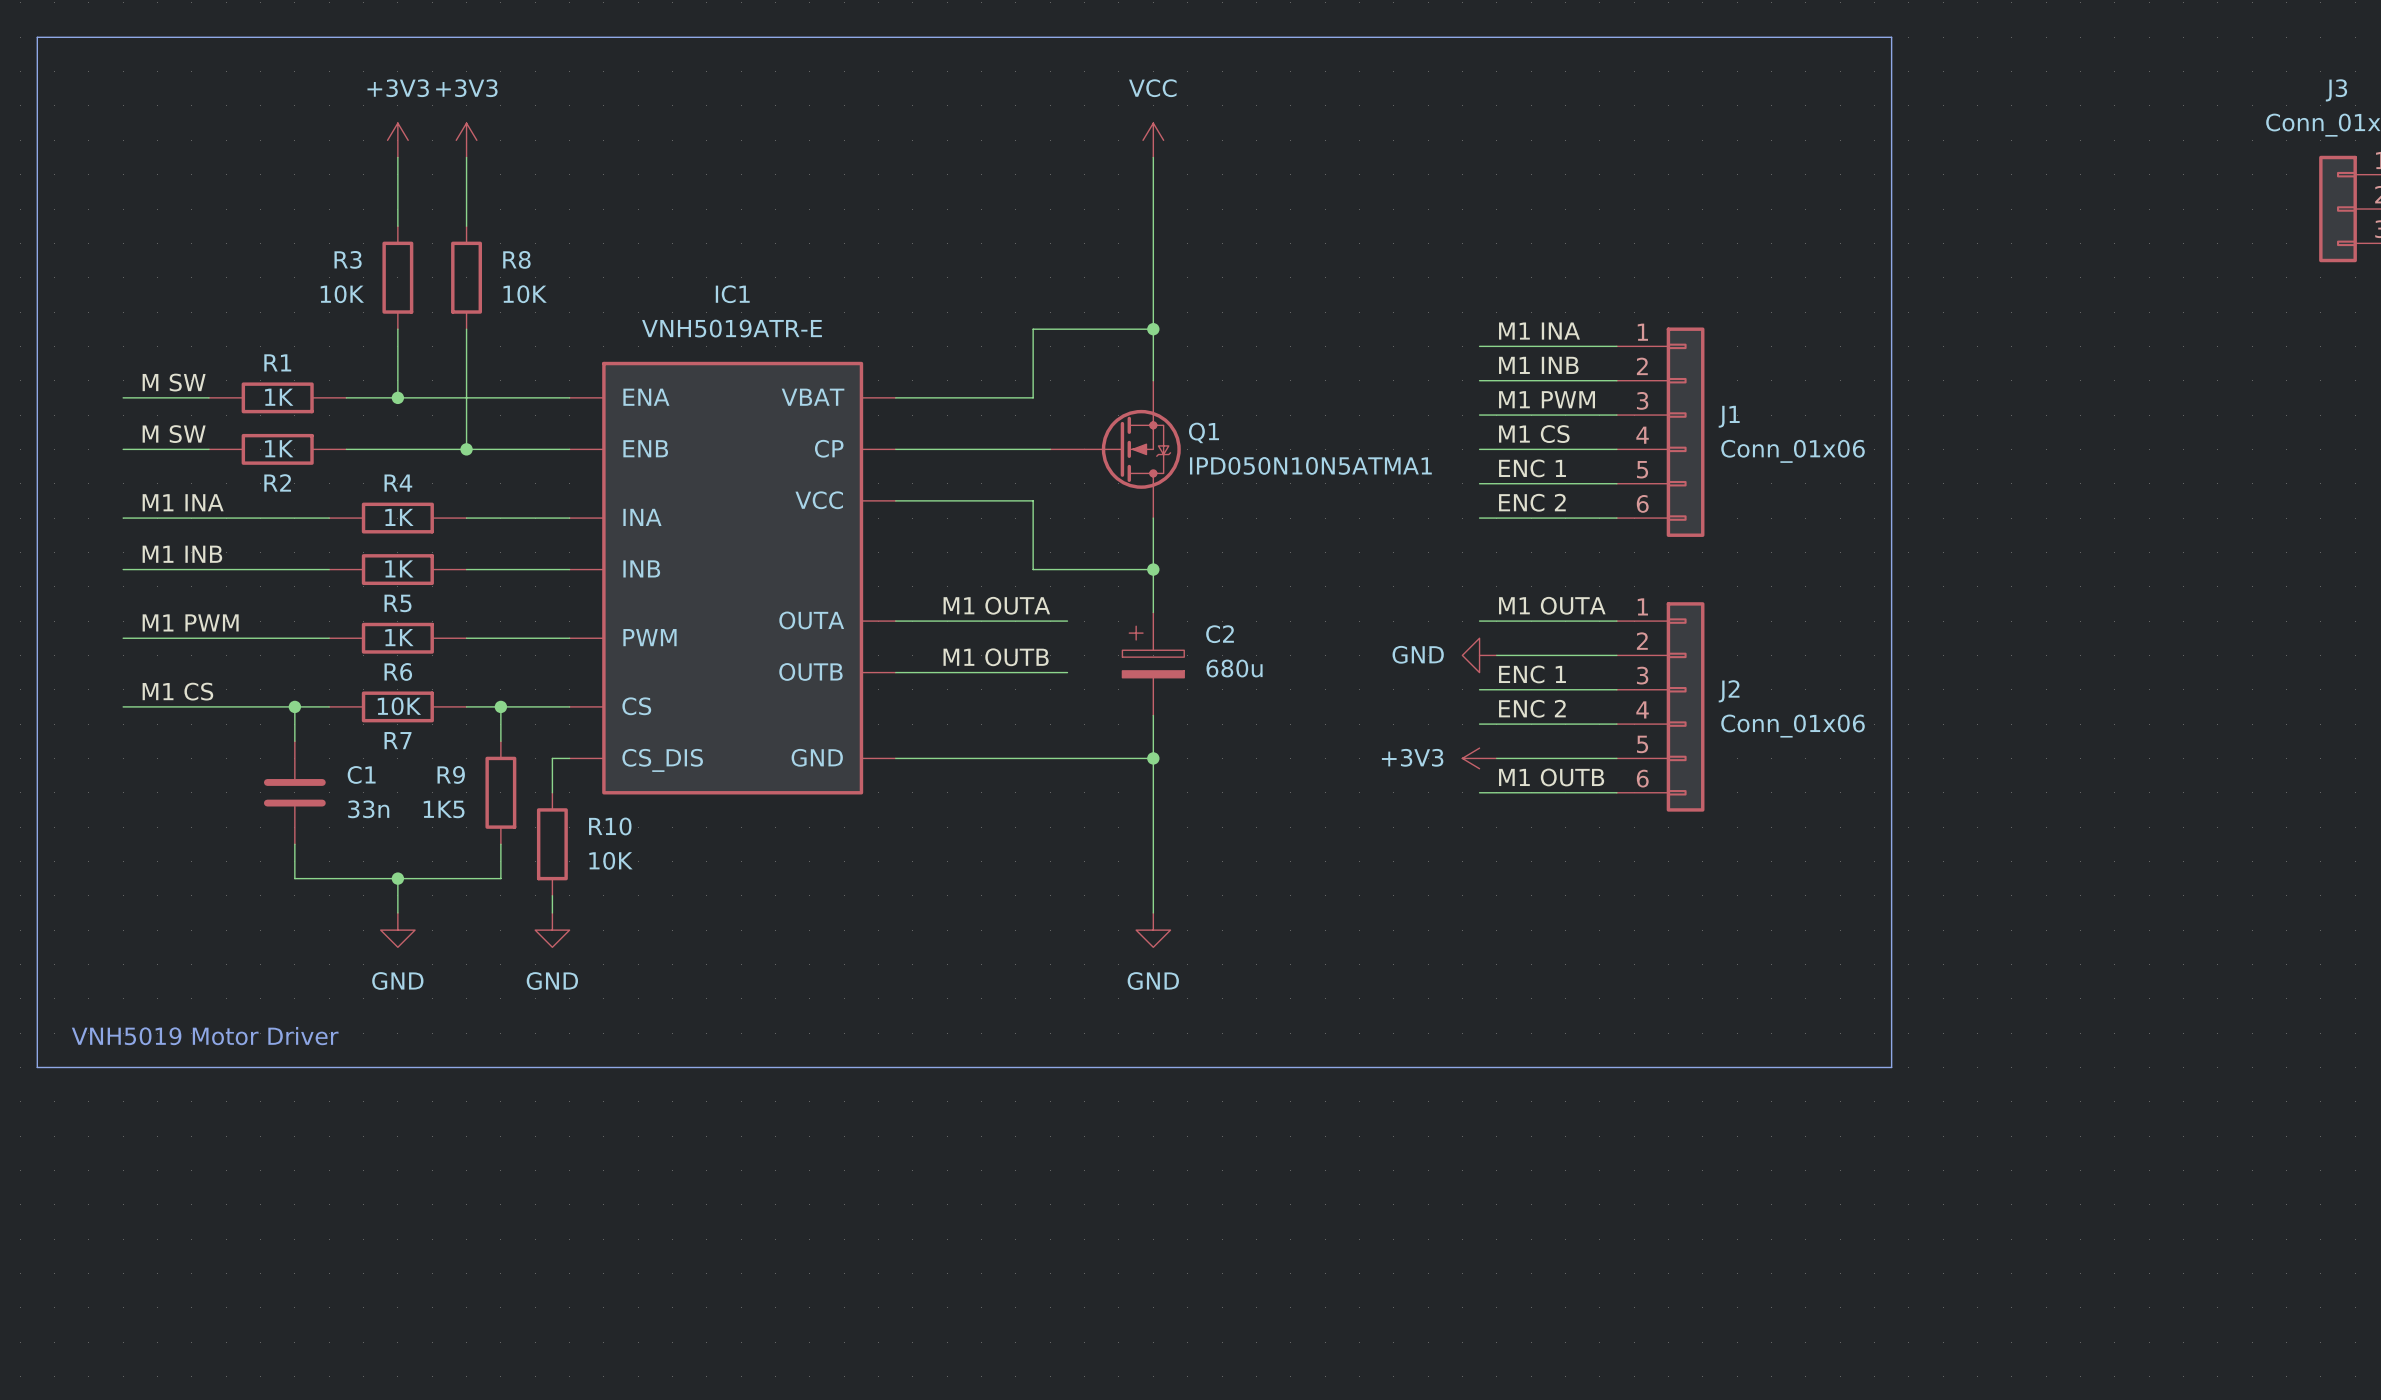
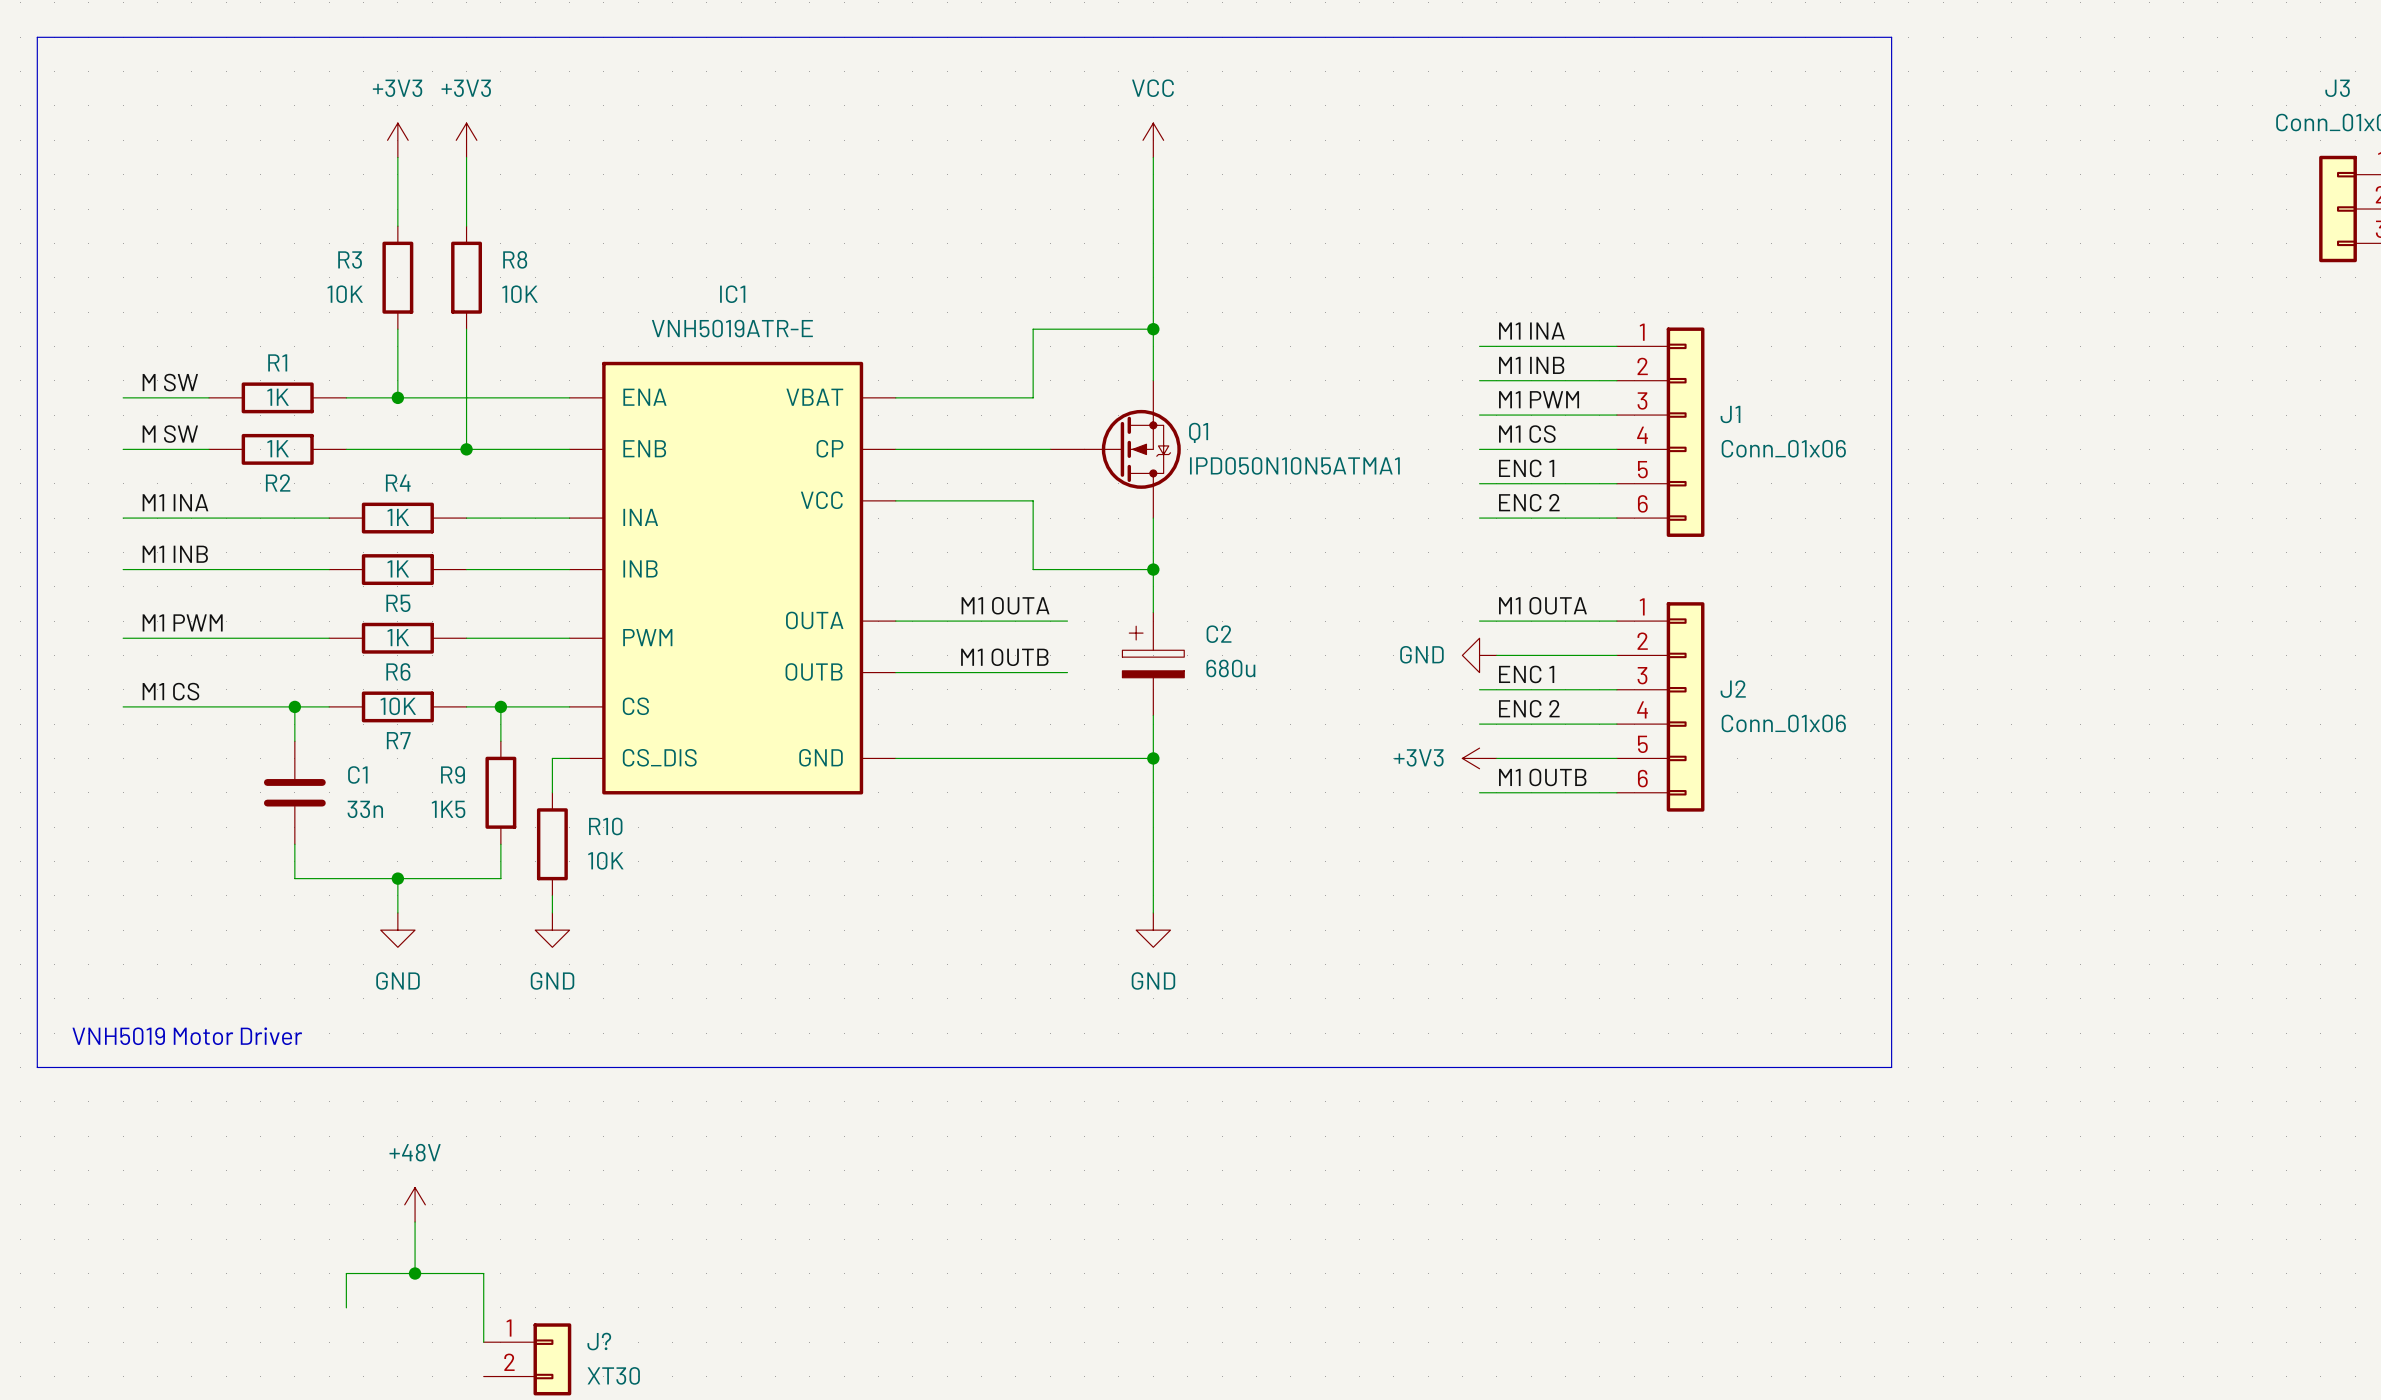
power symbol: none -> +48V (415, 1204)
wire: none -> (415, 1222) (415, 1273)
junction: none -> (415, 1273)
wire: none -> (346, 1307) (346, 1273) (483, 1273) (483, 1342)
J?: none -> XT30 (527, 1359)

